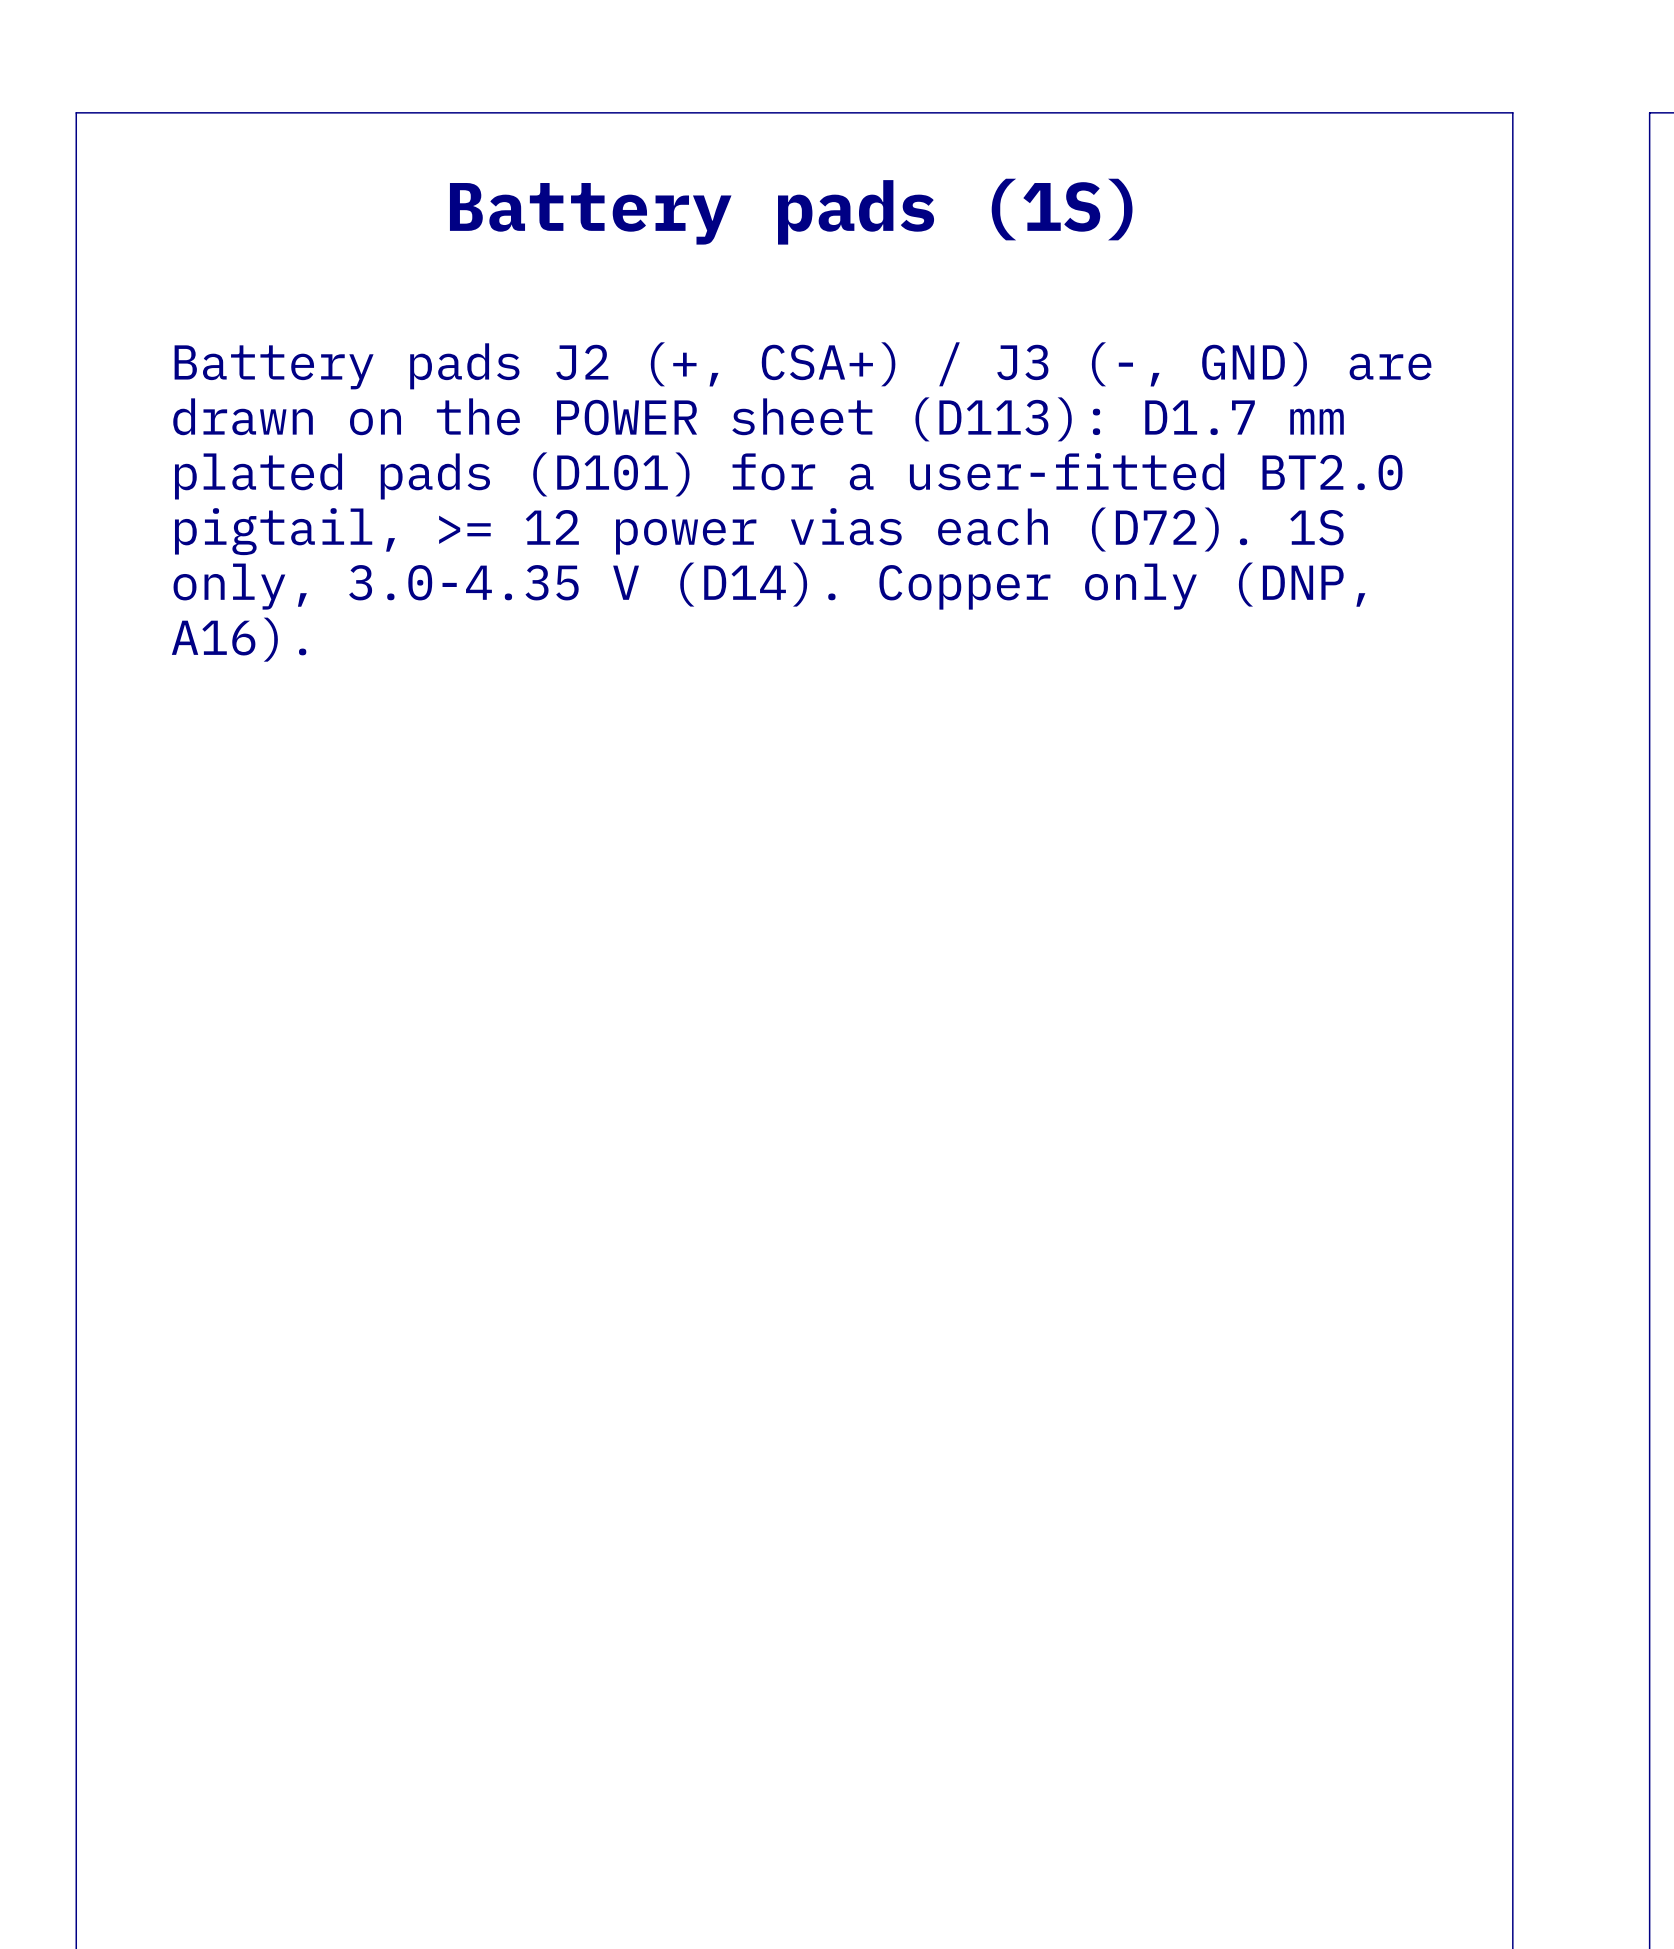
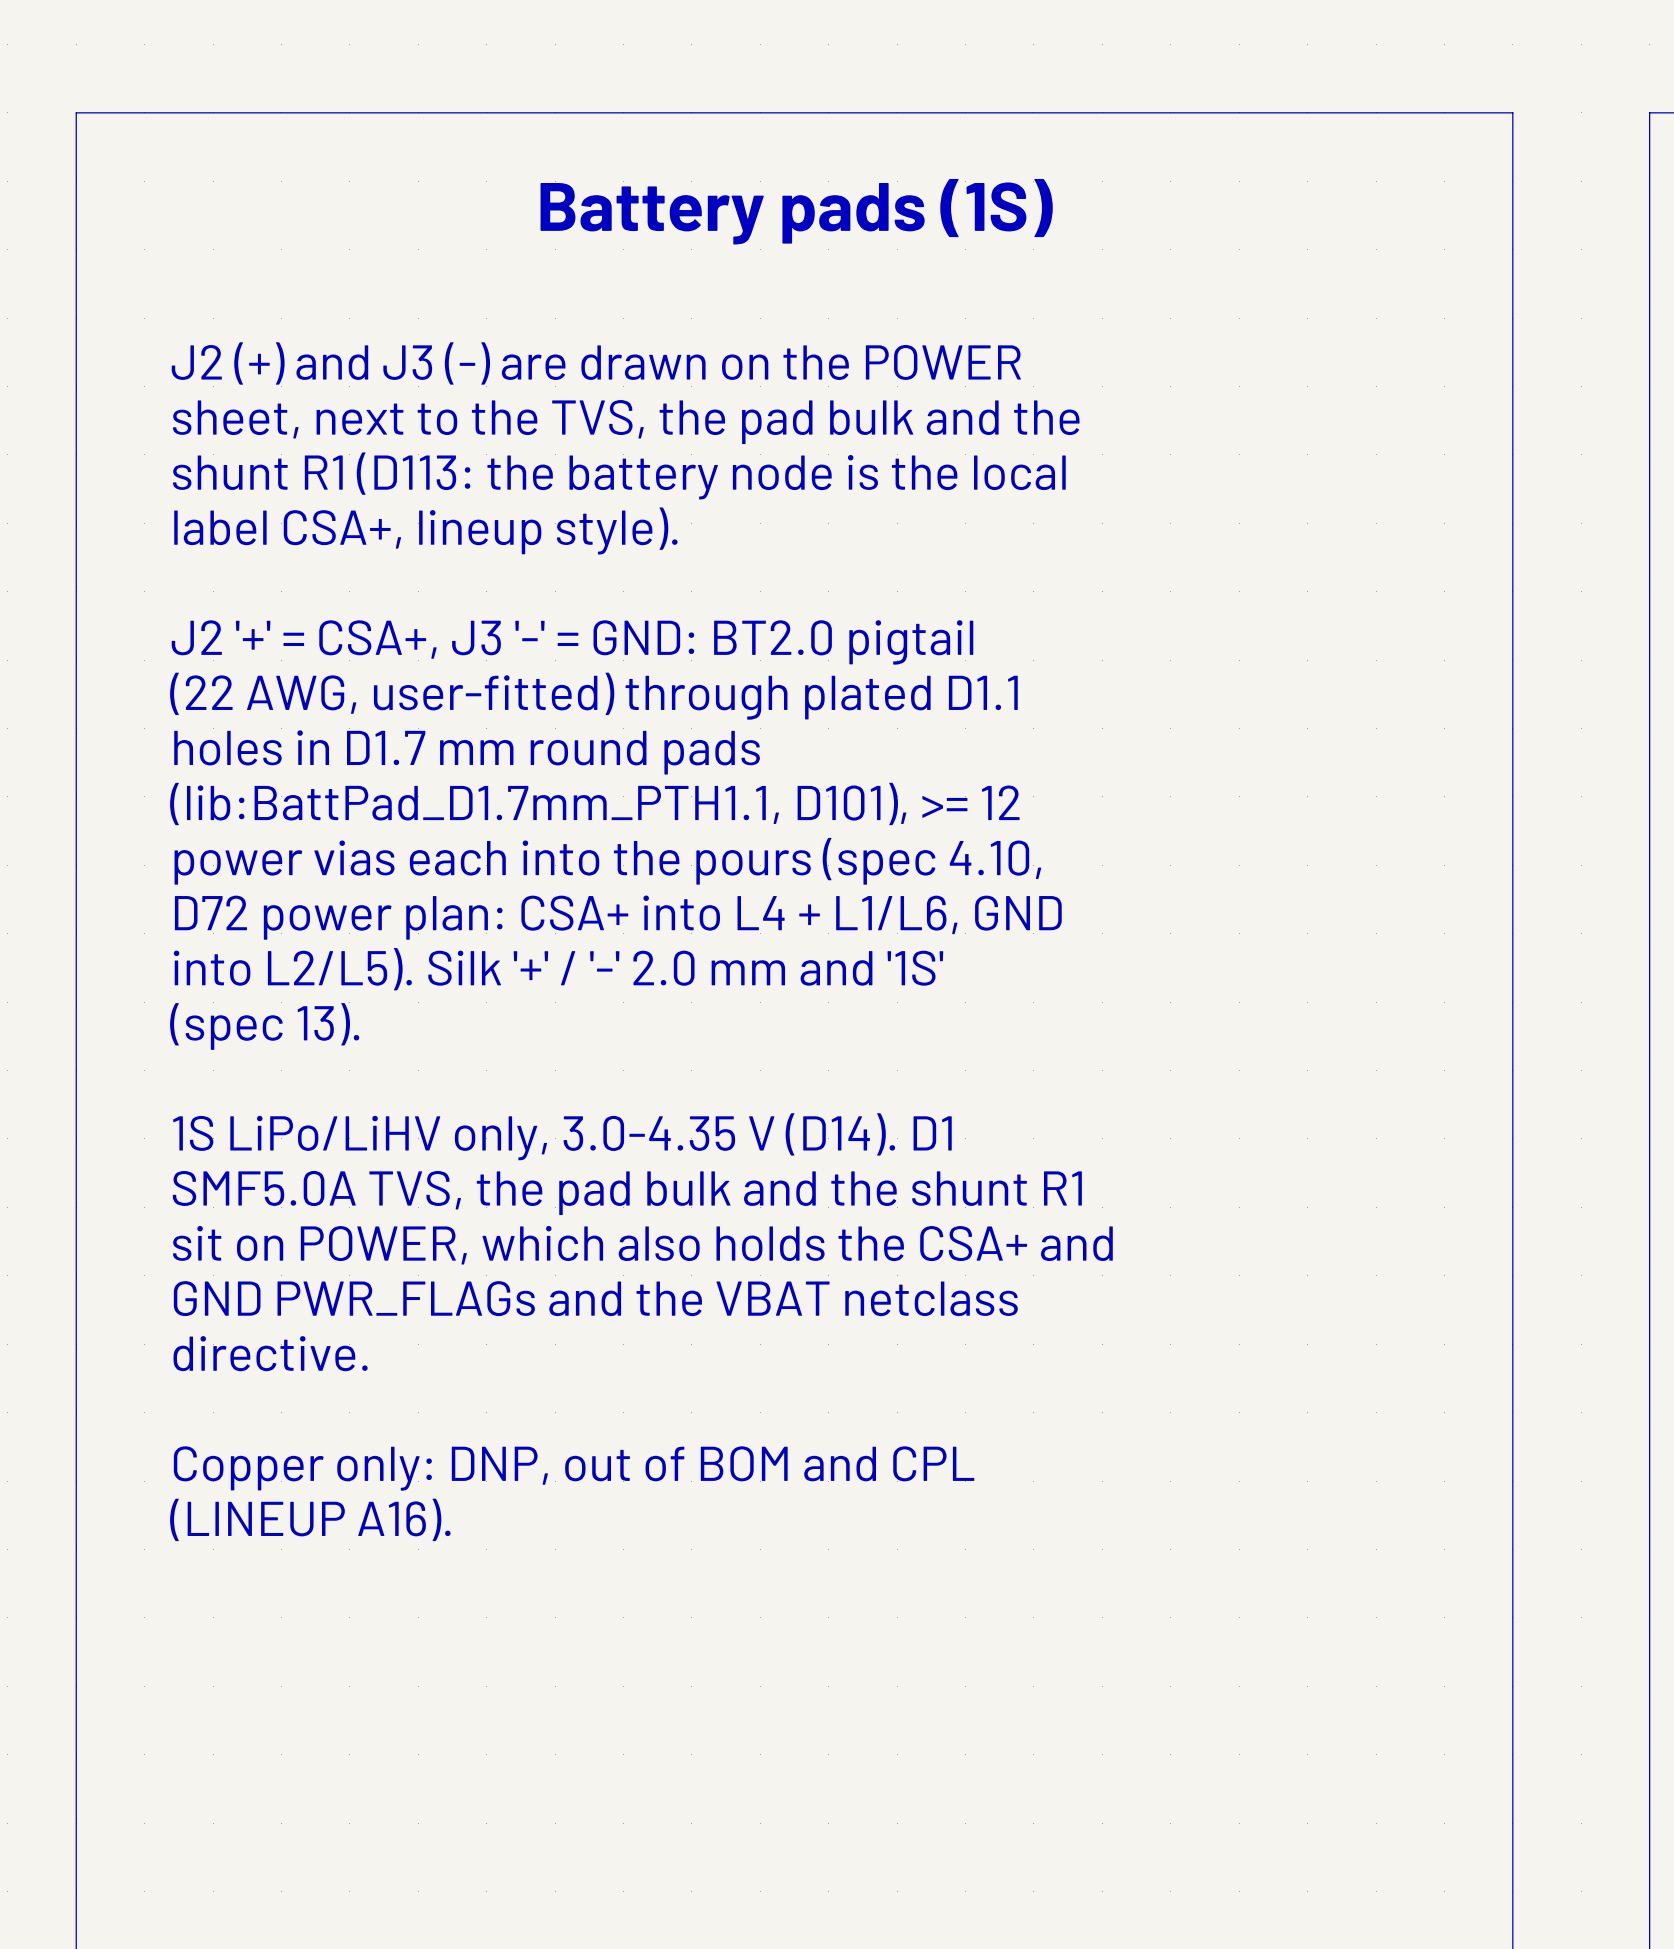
text: Battery pads J2 (+, CSA+) / J3 (-, GND) are (802, 365) -> J2 (+) and J3 (-) are drawn on the POWER (596, 363)
text: drawn on the POWER sheet (D113): D1.7 mm (758, 419) -> sheet, next to the TVS, the pad bulk and the (626, 422)
text: plated pads (D101) for a user-fitted BT2.0 (788, 475) -> shunt R1 (D113: the battery node is the local (619, 475)
text: pigtail, >= 12 power vias each (D72). 1S (759, 531) -> label CSA+, lineup style). (425, 531)
text: only, 3.0-4.35 V (D14). Copper only (DNP, (769, 586) -> none
text: A16). (239, 639) -> J2 '+' = CSA+, J3 '-' = GND: BT2.0 pigtail (572, 642)
text: none -> (22 AWG, user-fitted) through plated D1.1 (593, 696)
text: none -> holes in D1.7 mm round pads (467, 752)
text: none -> (lib:BattPad_D1.7mm_PTH1.1, D101), >= 12 (594, 804)
text: none -> power vias each into the pours (spec 4.10, (607, 861)
text: none -> D72 power plan: CSA+ into L4 + L1/L6, GND (618, 917)
text: none -> into L2/L5). Silk '+' / '-' 2.0 mm and '1S' (558, 969)
text: none -> (spec 13). (264, 1026)
text: none -> 1S LiPo/LiHV only, 3.0-4.35 V (D14). D1 (562, 1136)
text: none -> SMF5.0A TVS, the pad bulk and the shunt R1 (627, 1192)
text: none -> sit on POWER, which also holds the CSA+ and (642, 1245)
text: none -> GND PWR_FLAGs and the VBAT netclass (595, 1298)
text: none -> directive. (270, 1353)
text: none -> Copper only: DNP, out of BOM and CPL (574, 1468)
text: none -> (LINEUP A16). (310, 1519)

